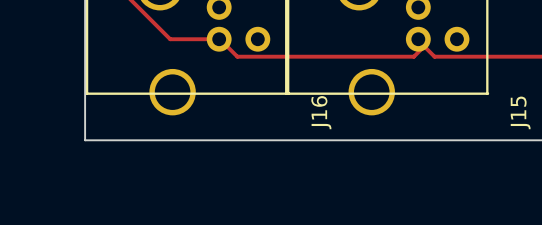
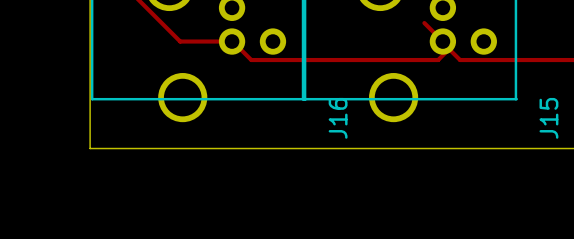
track: none -> (424, 23) (442, 41)

